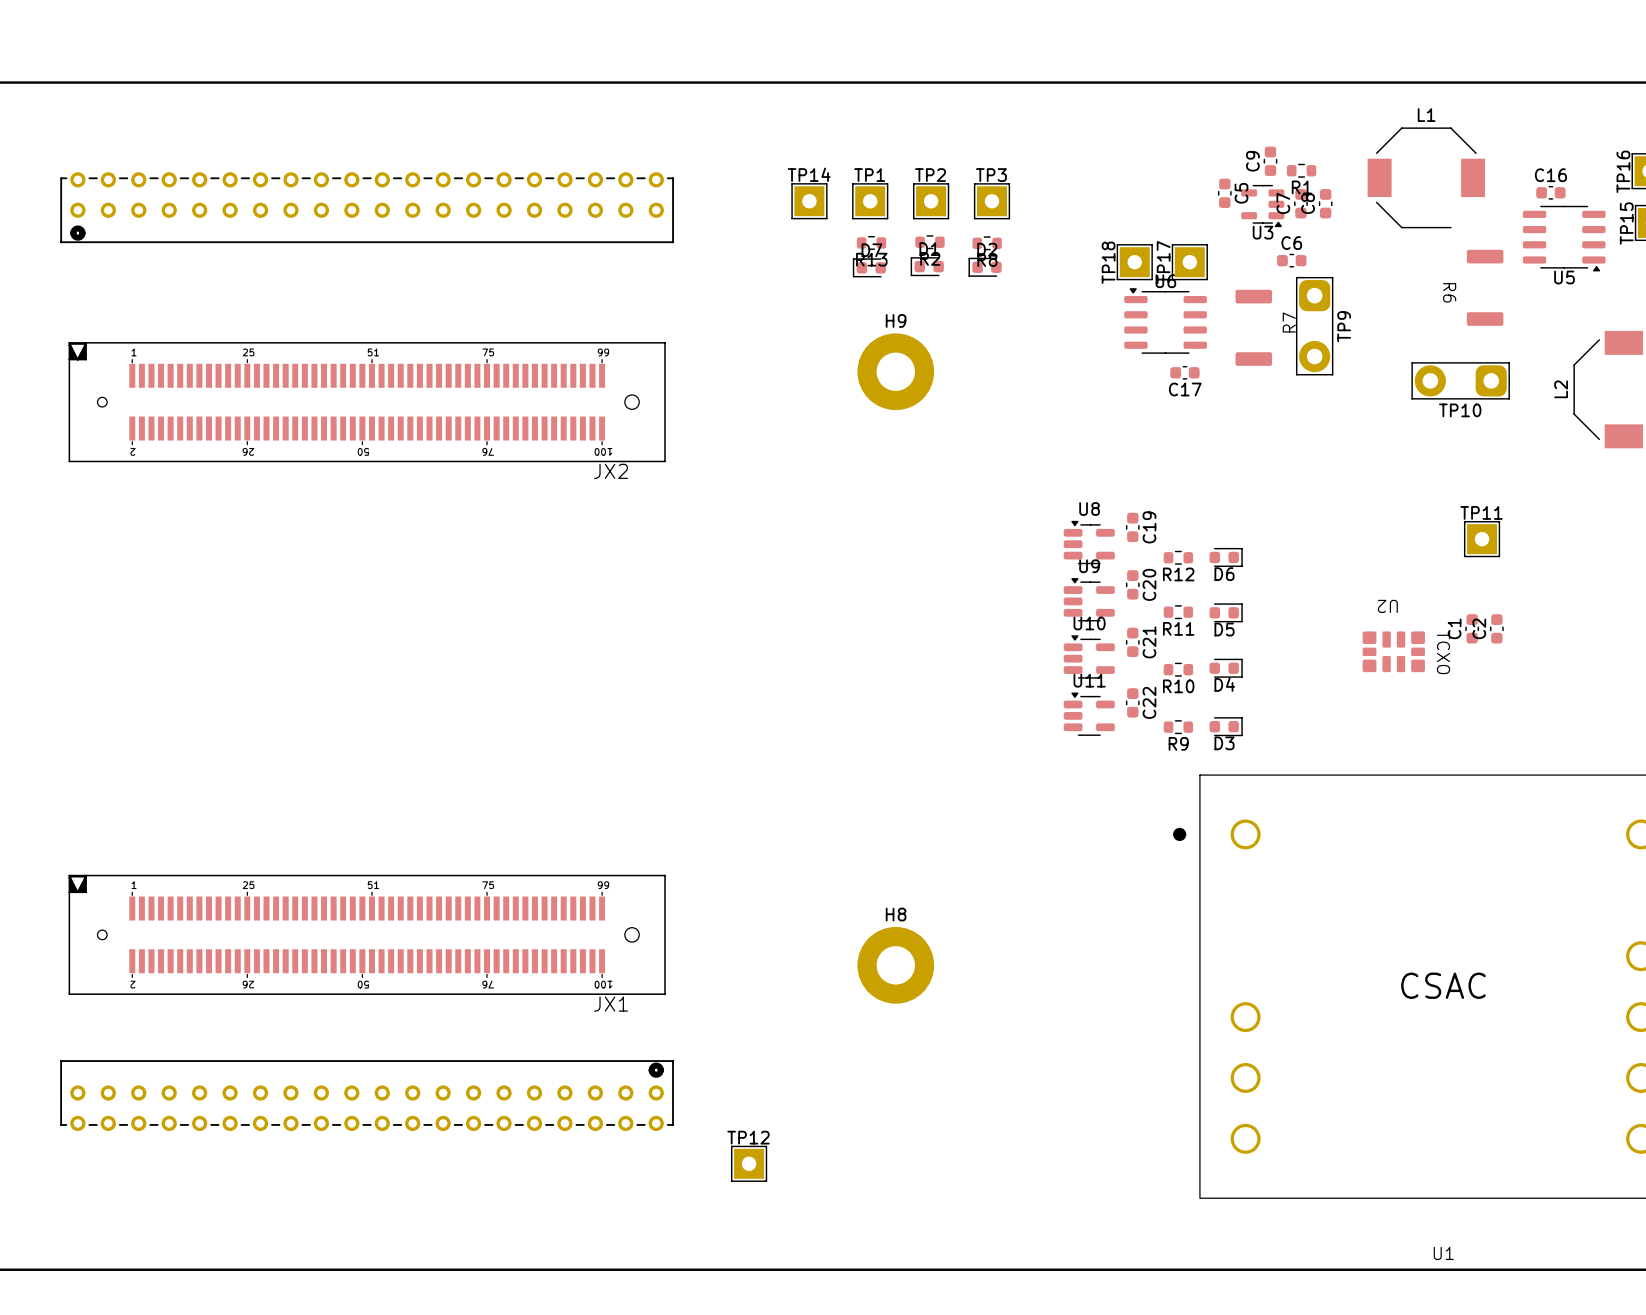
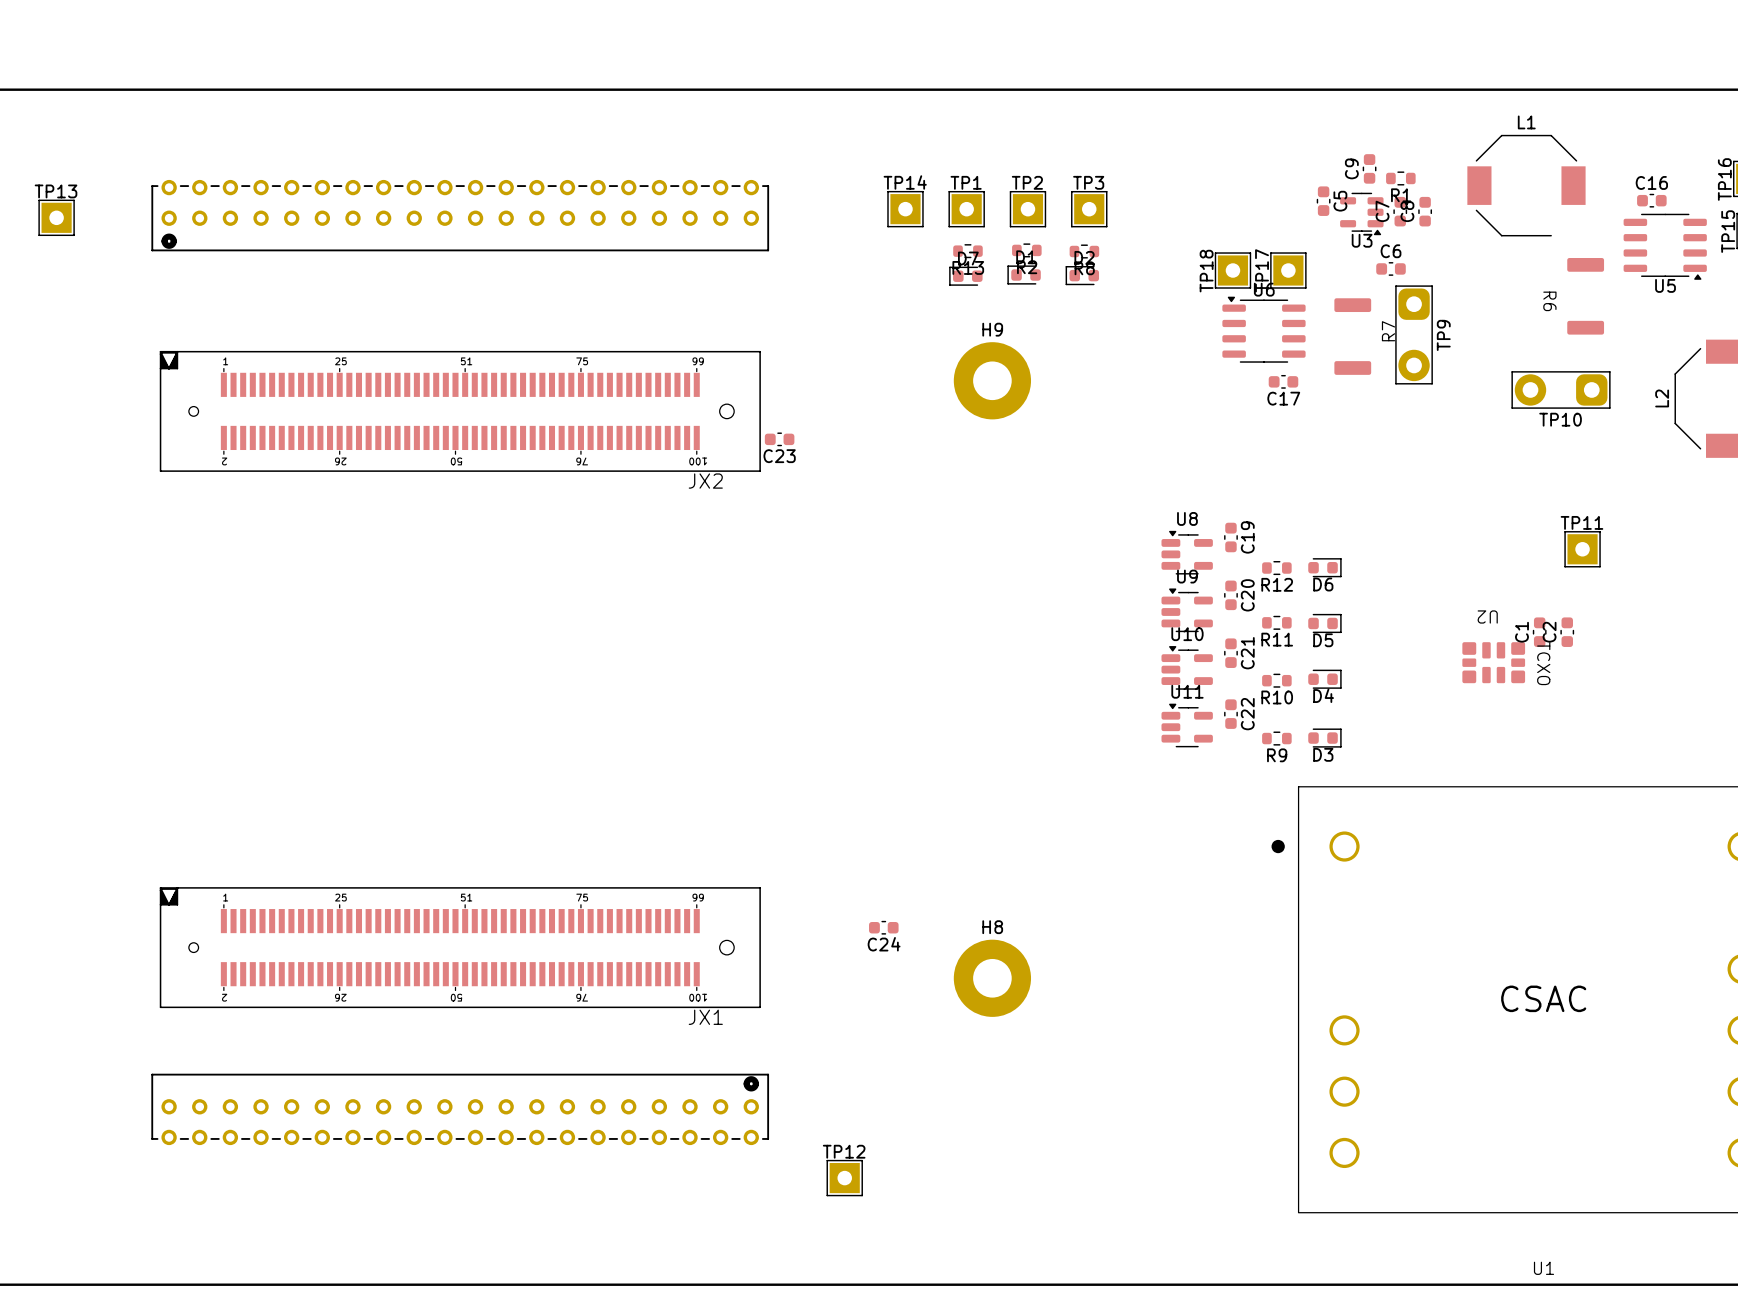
C23: none -> (779, 439)
C1 position: (1472, 628) -> (1539, 632)
C2 position: (1496, 628) -> (1567, 632)
C24: none -> (883, 927)

